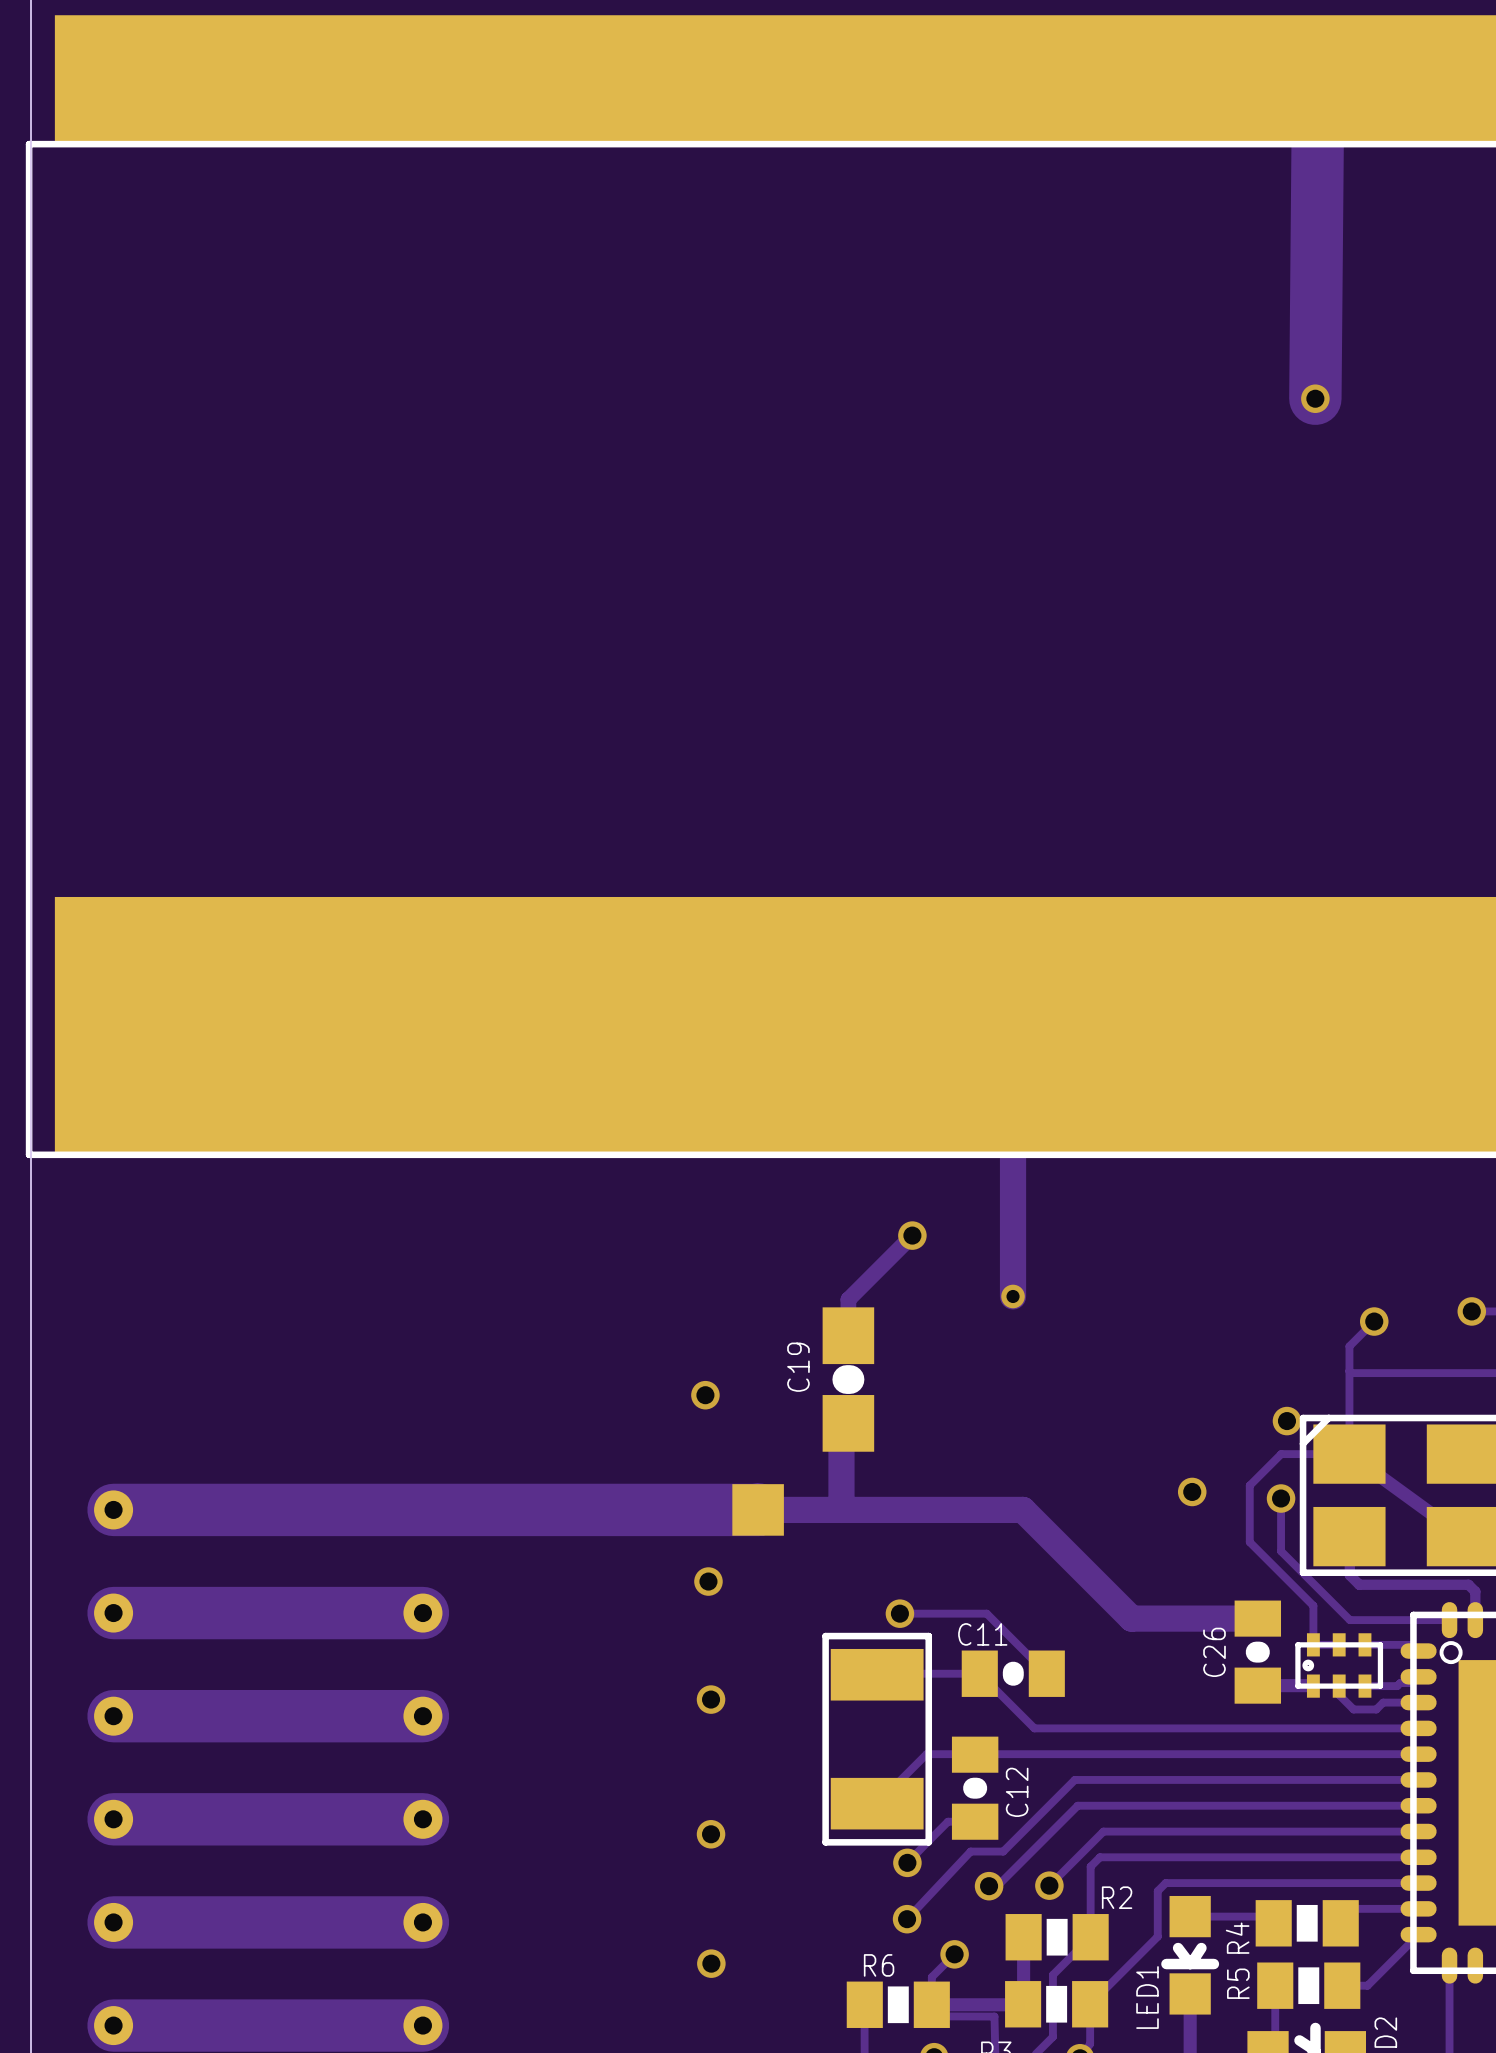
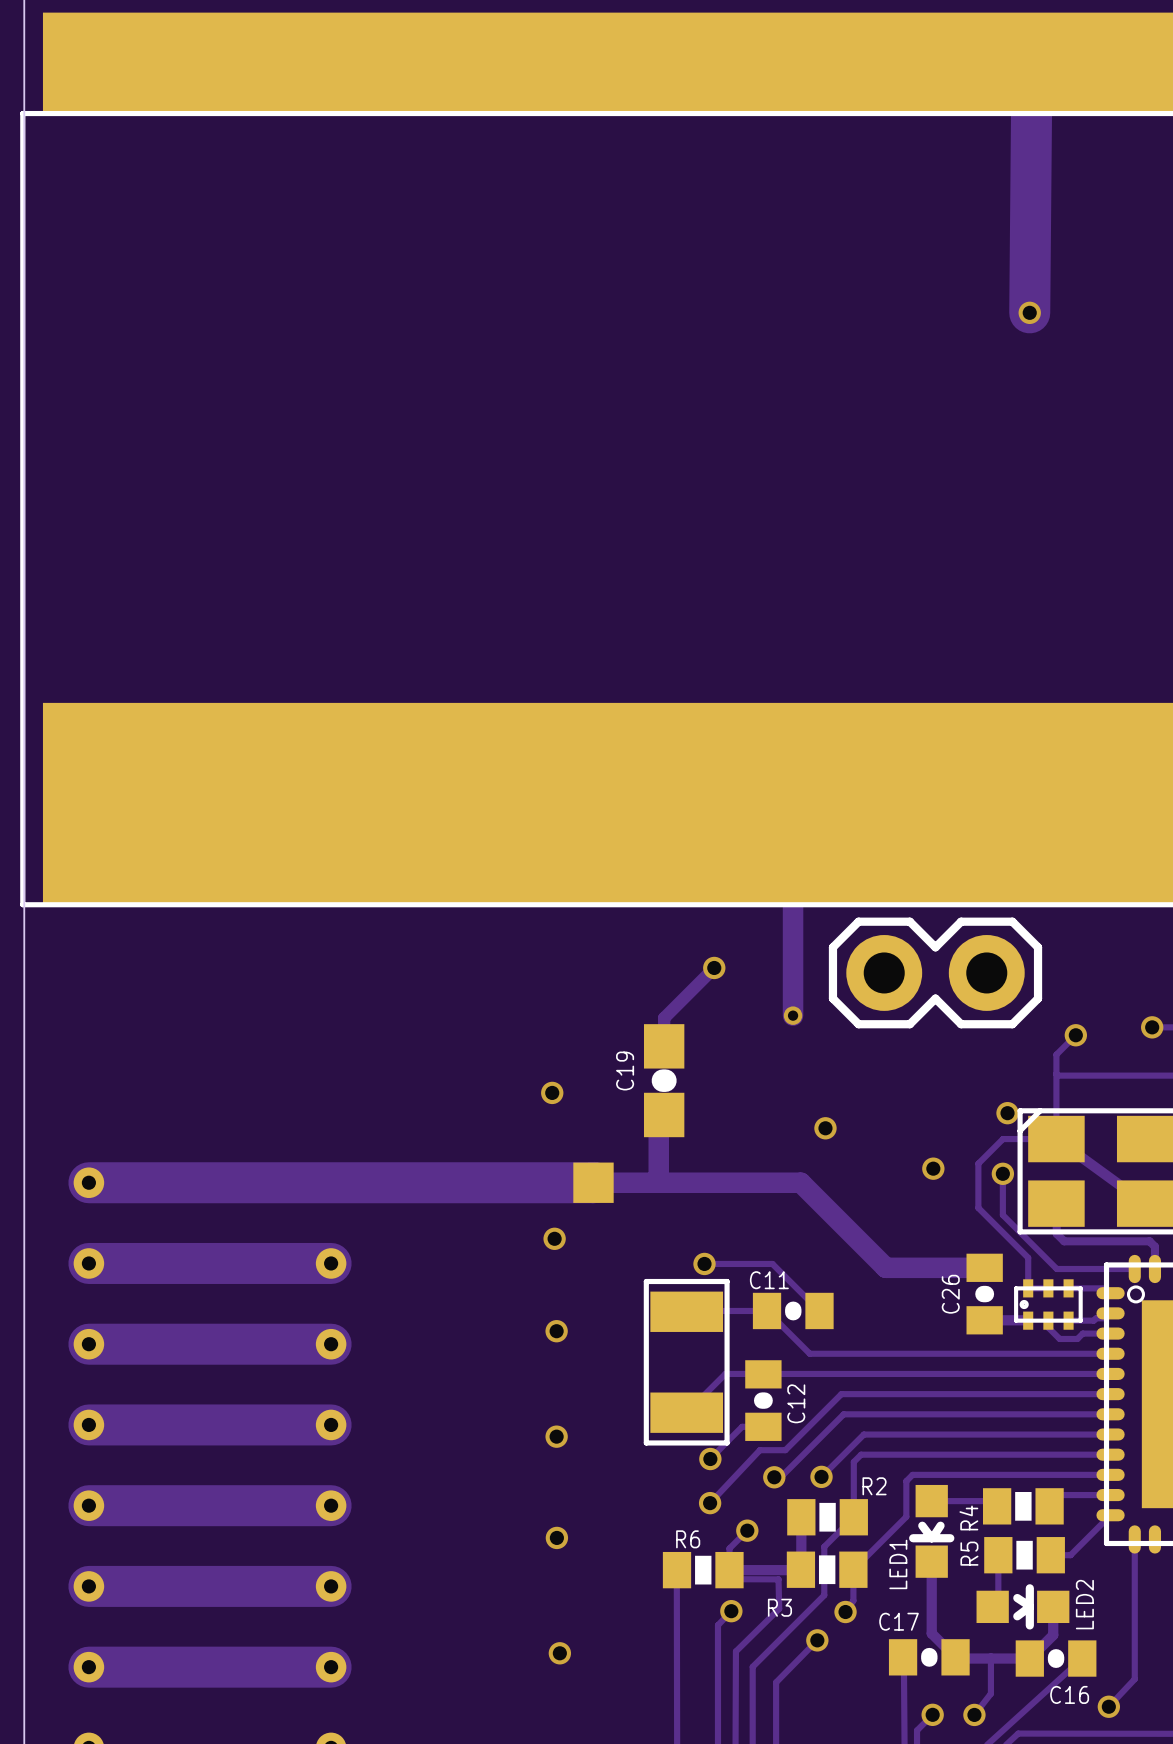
part: none -> (935, 972)
via: none -> (825, 1128)

